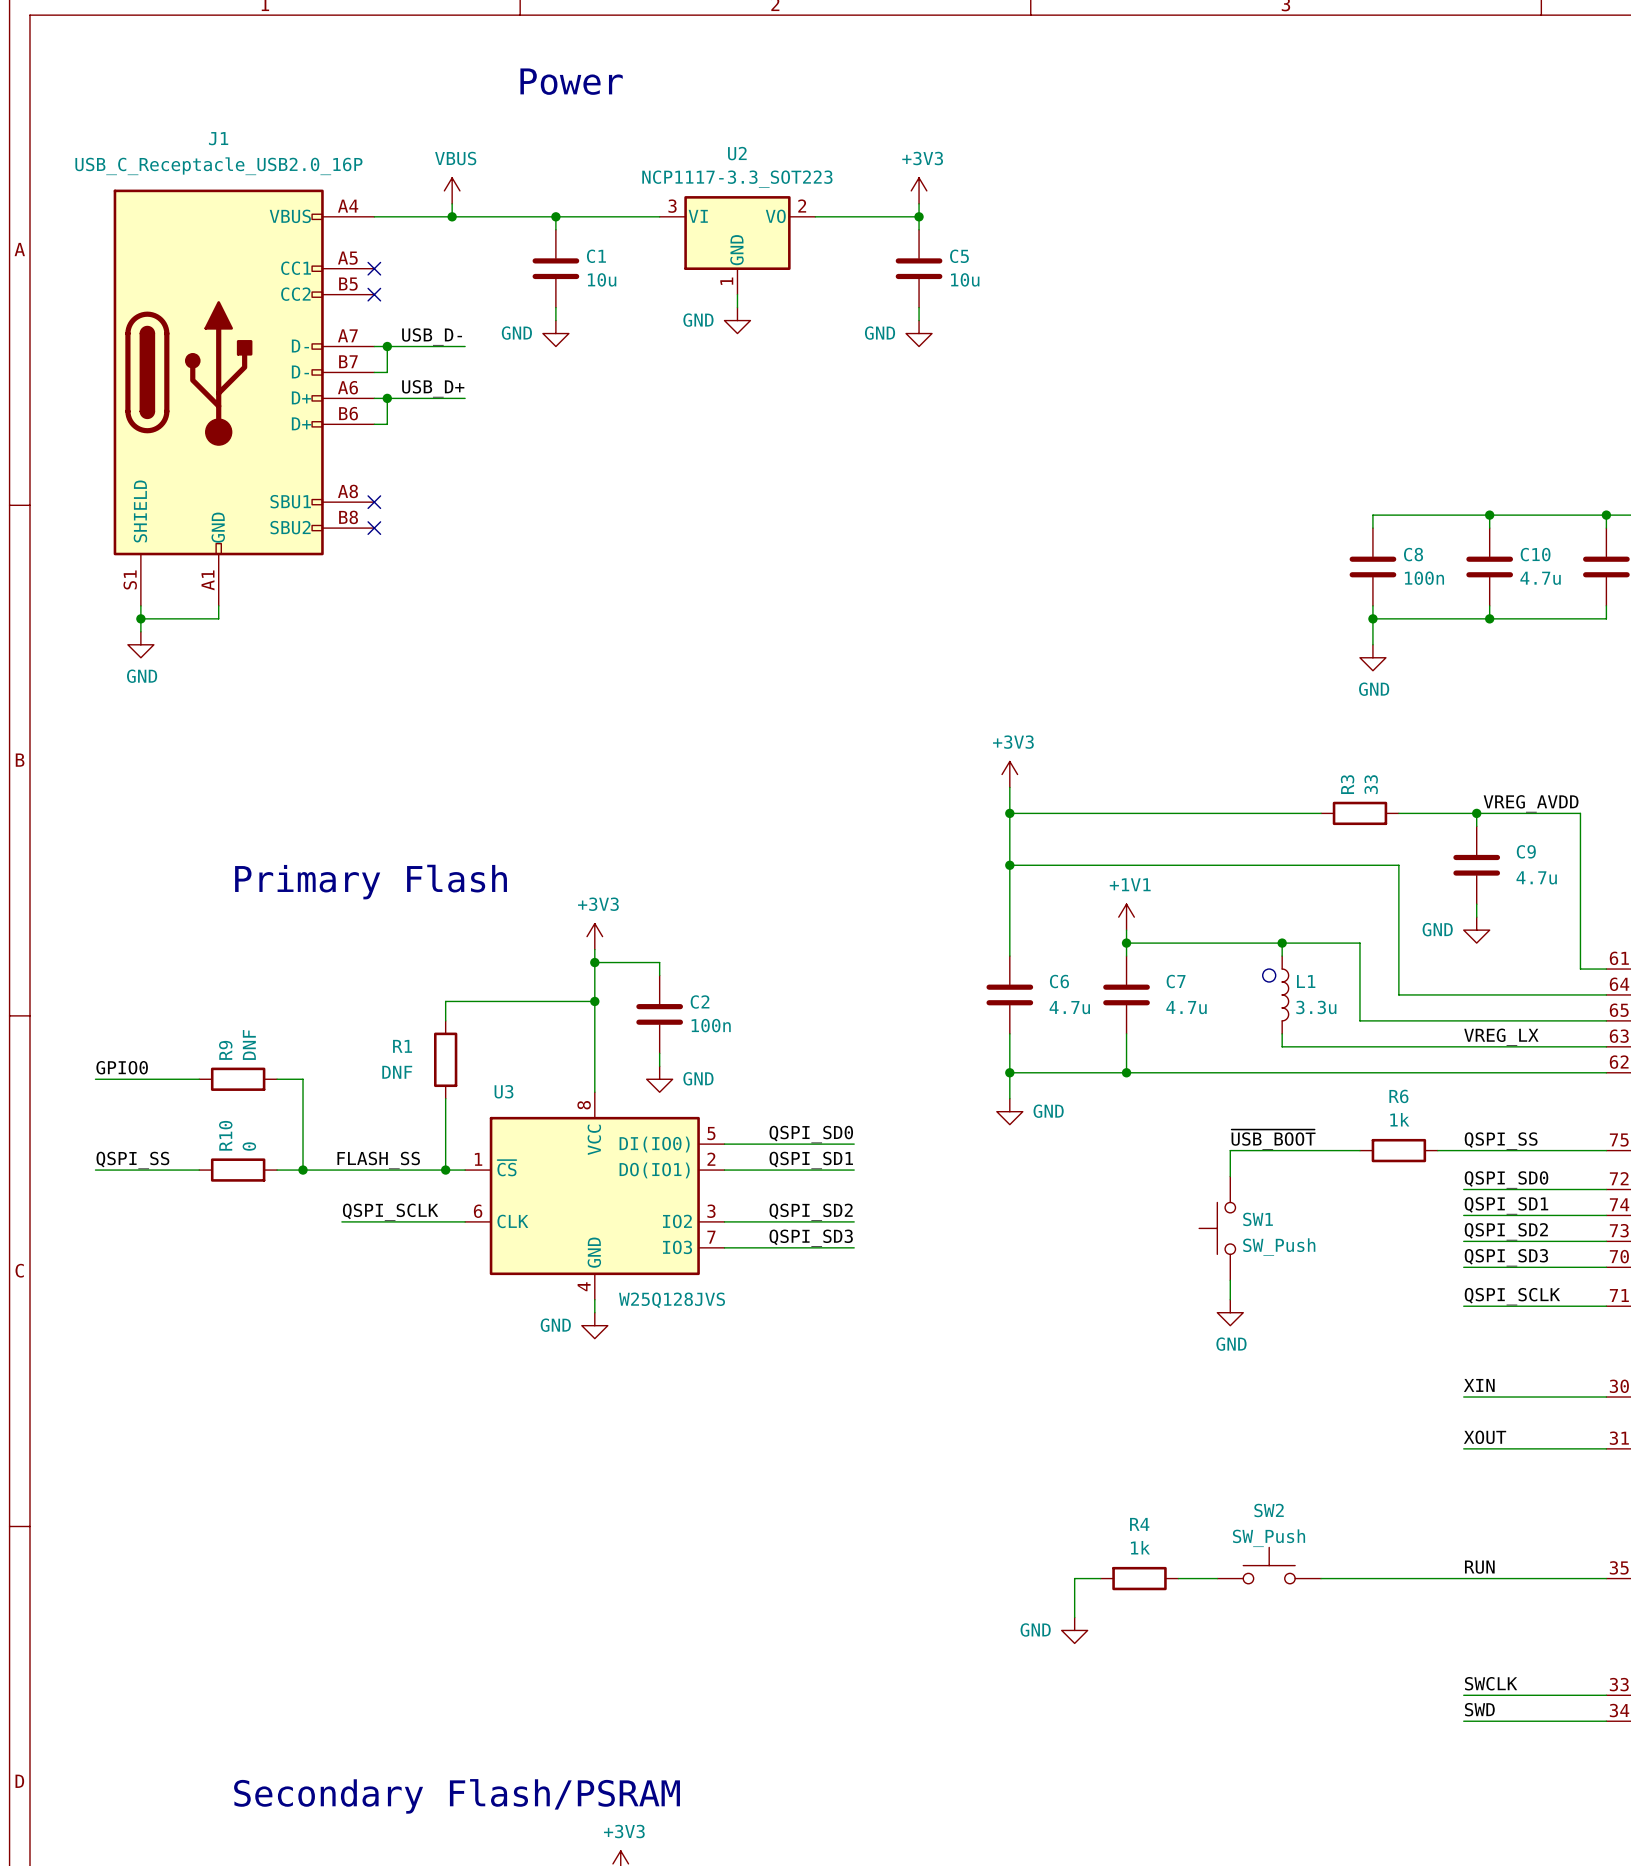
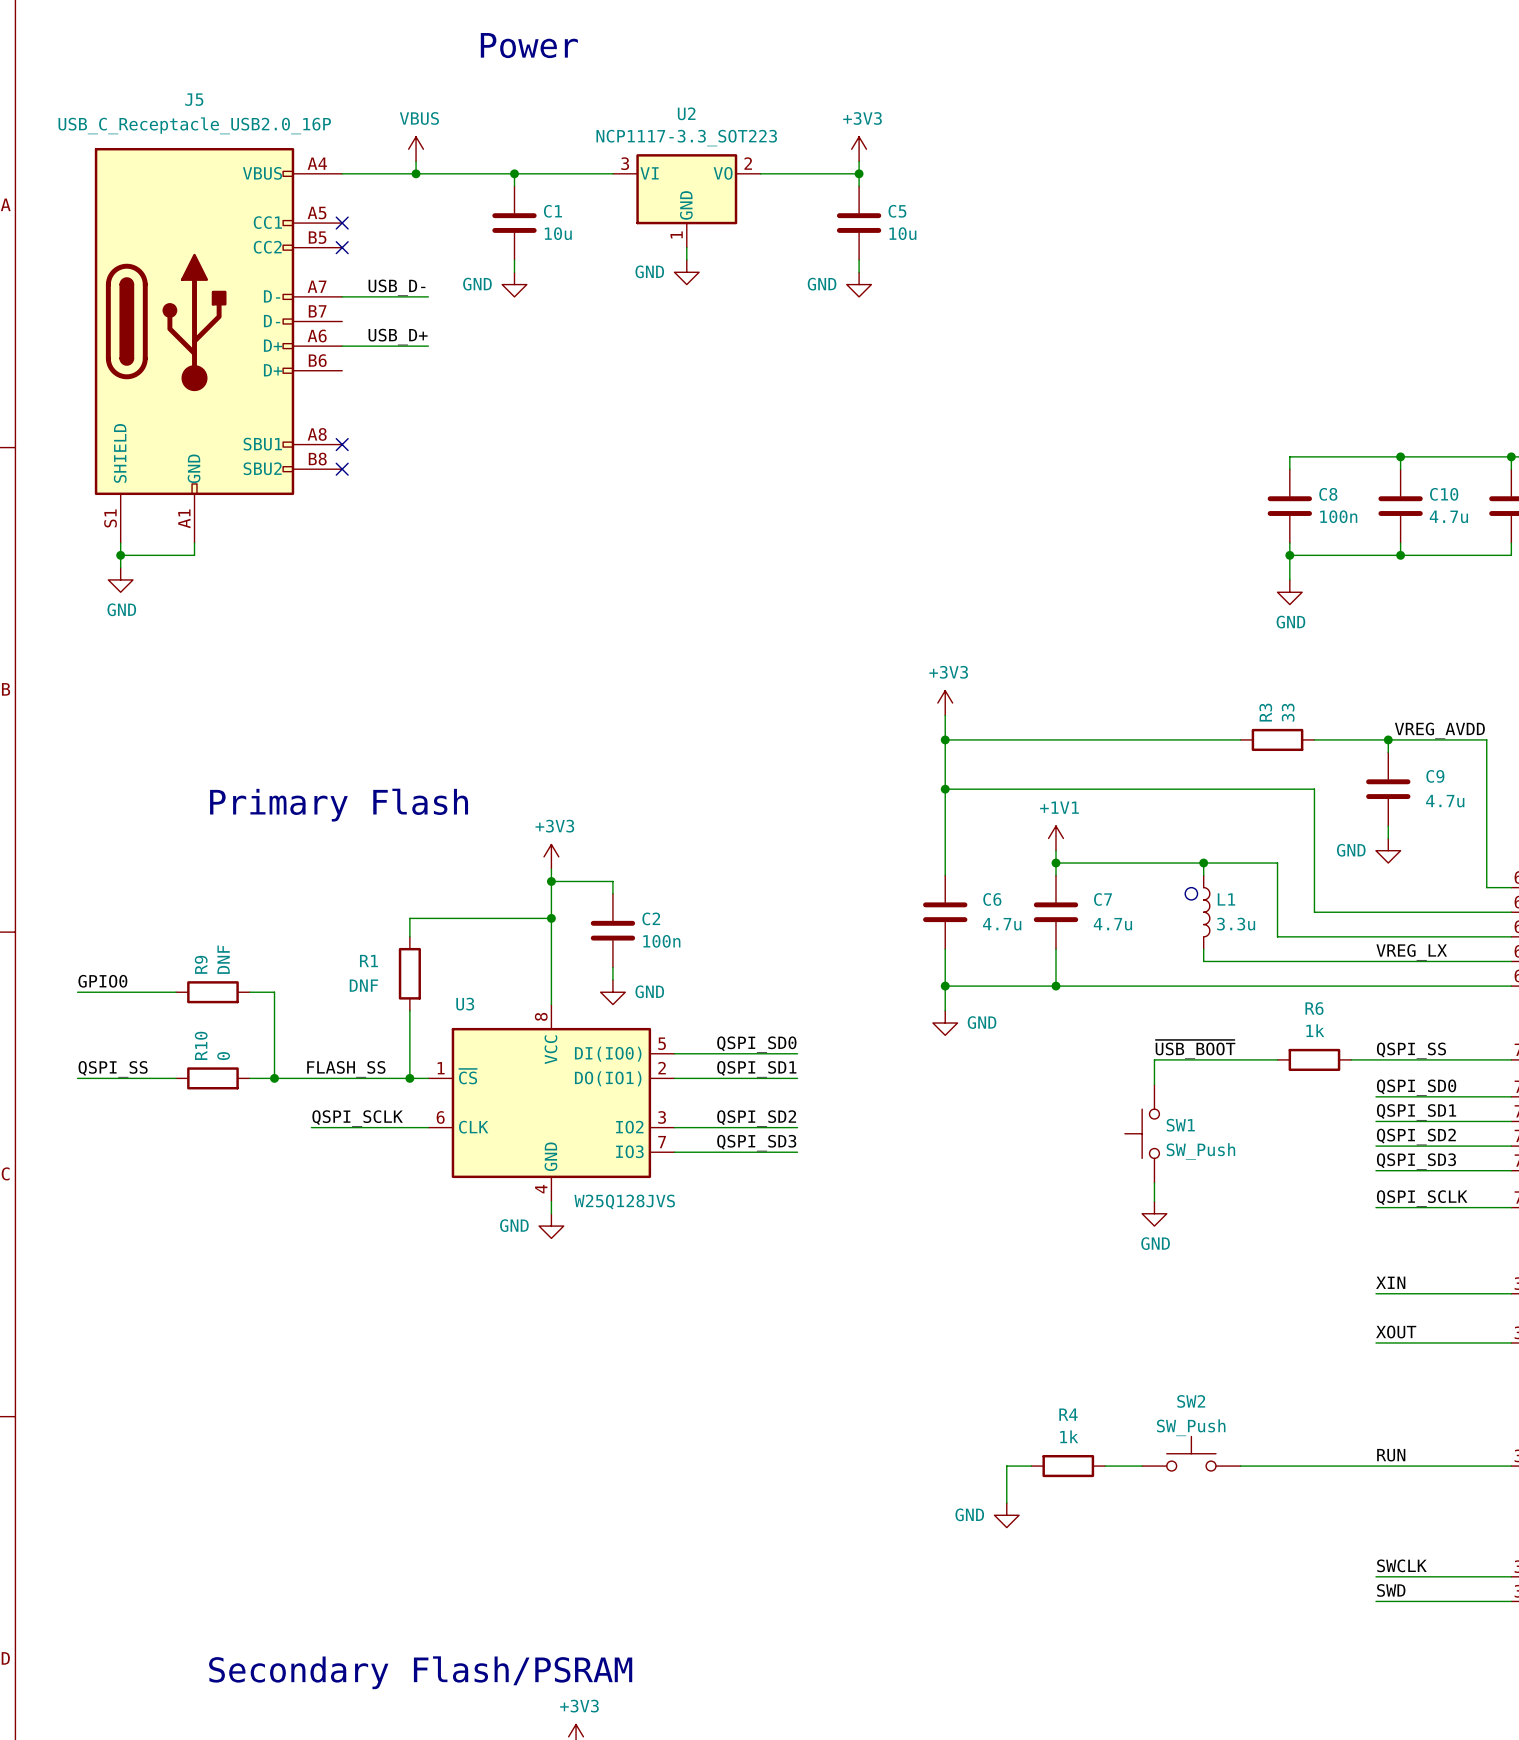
J1 name: J1 (218, 138) -> J5 (194, 99)
wire: (387, 346) (387, 372) (374, 372) -> none
junction: (387, 346) -> none
wire: (387, 398) (387, 424) (374, 424) -> none
junction: (387, 398) -> none

